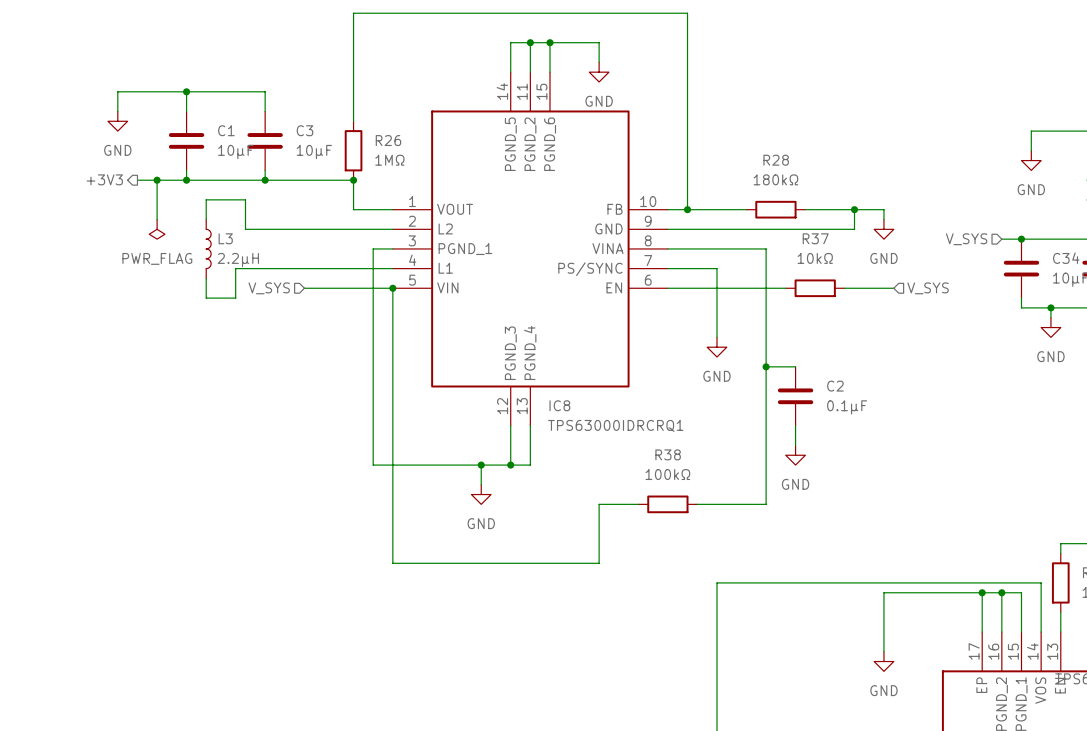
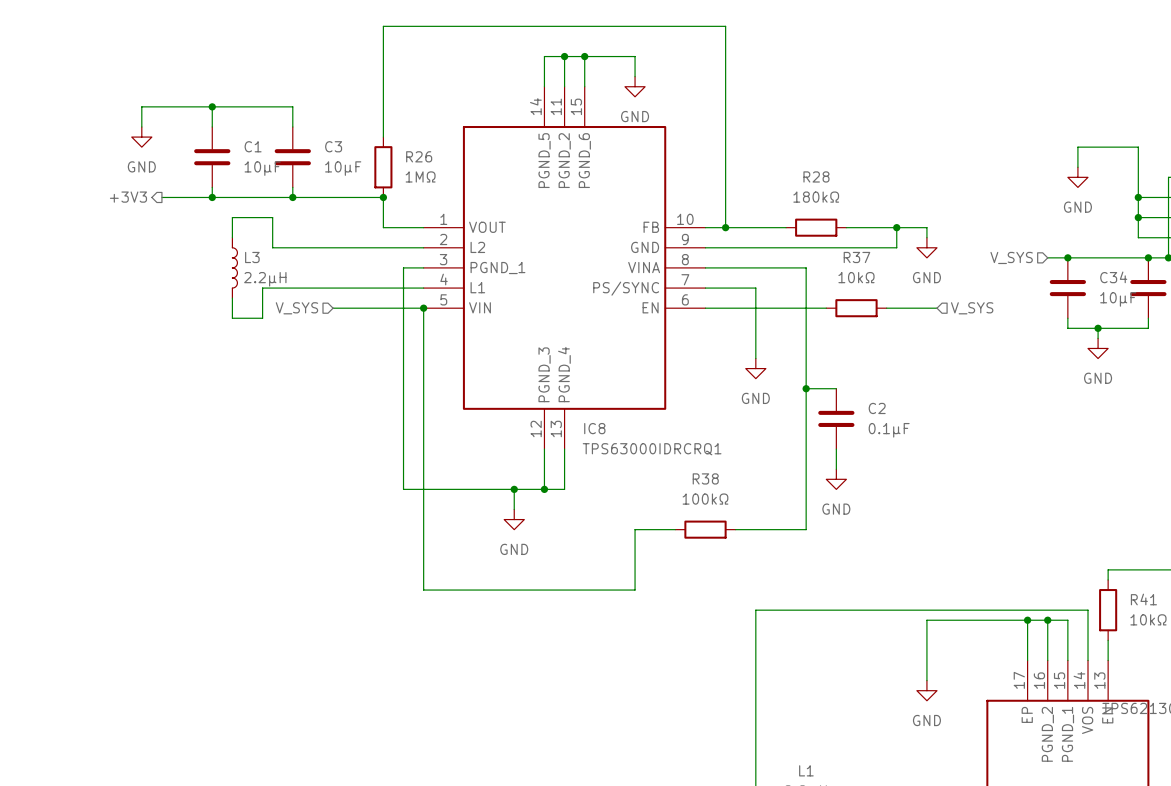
wire: (157, 180) (157, 219) -> none
junction: (157, 180) -> none
power symbol: PWR_FLAG (157, 229) -> none

